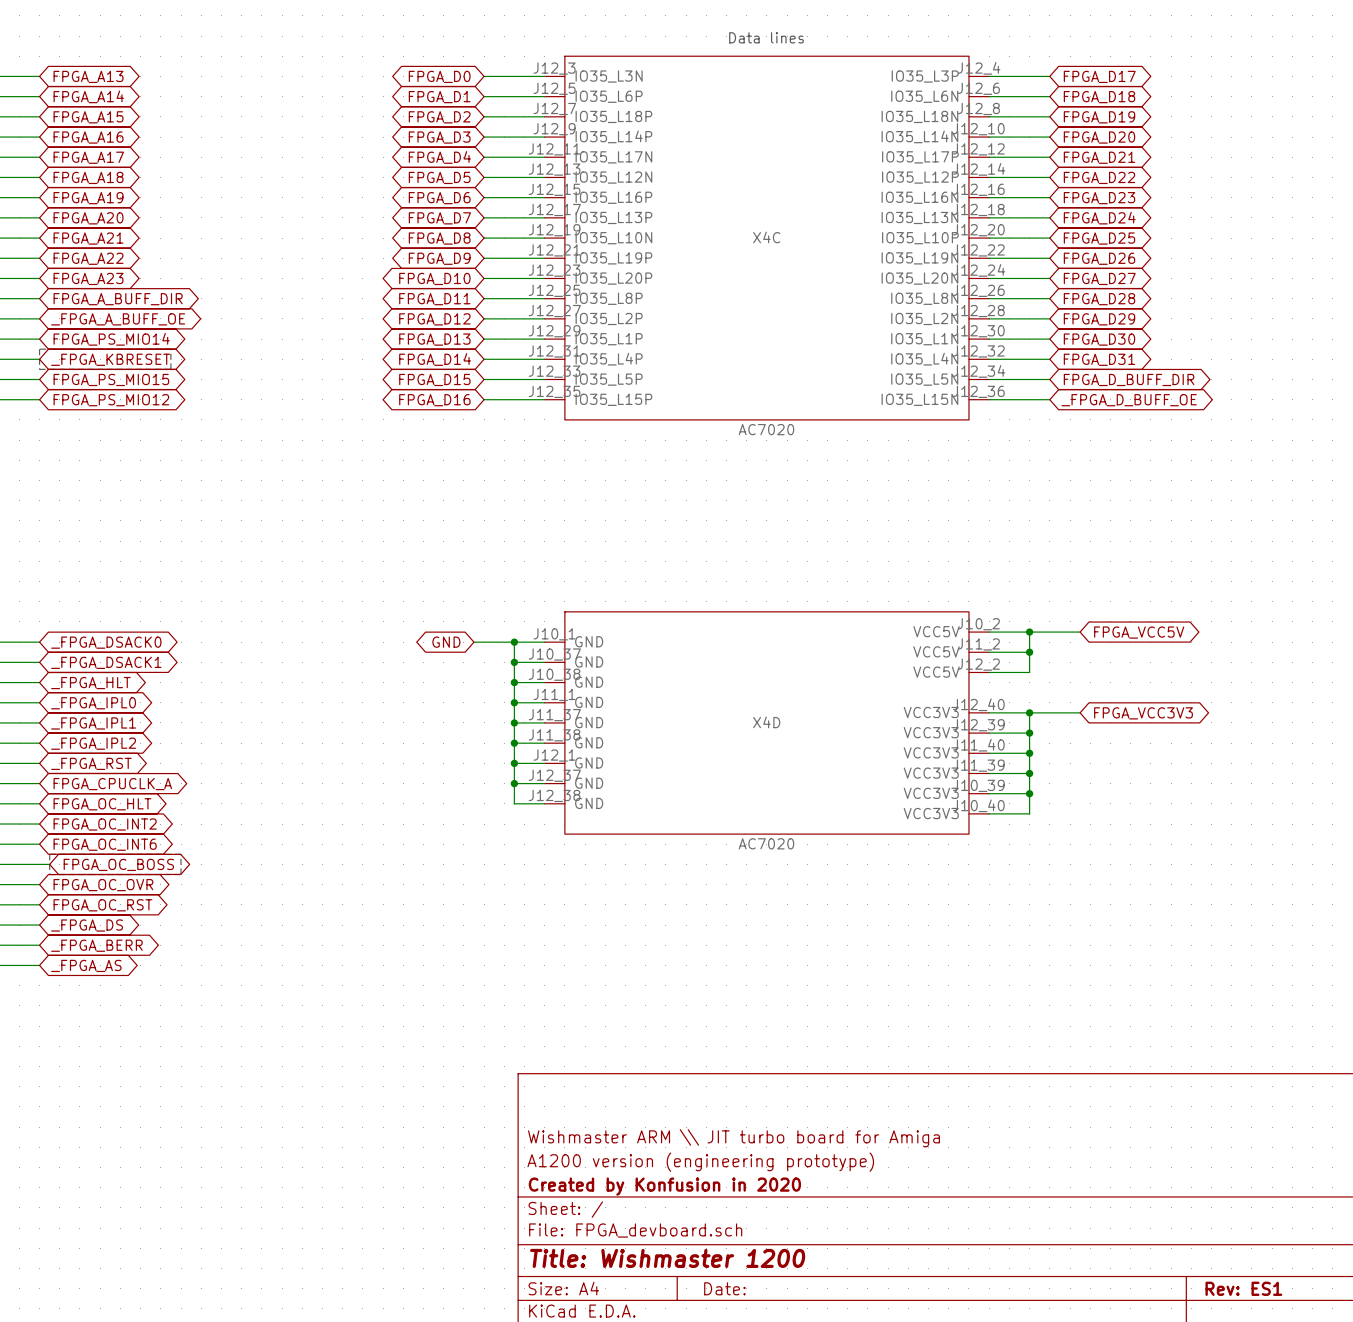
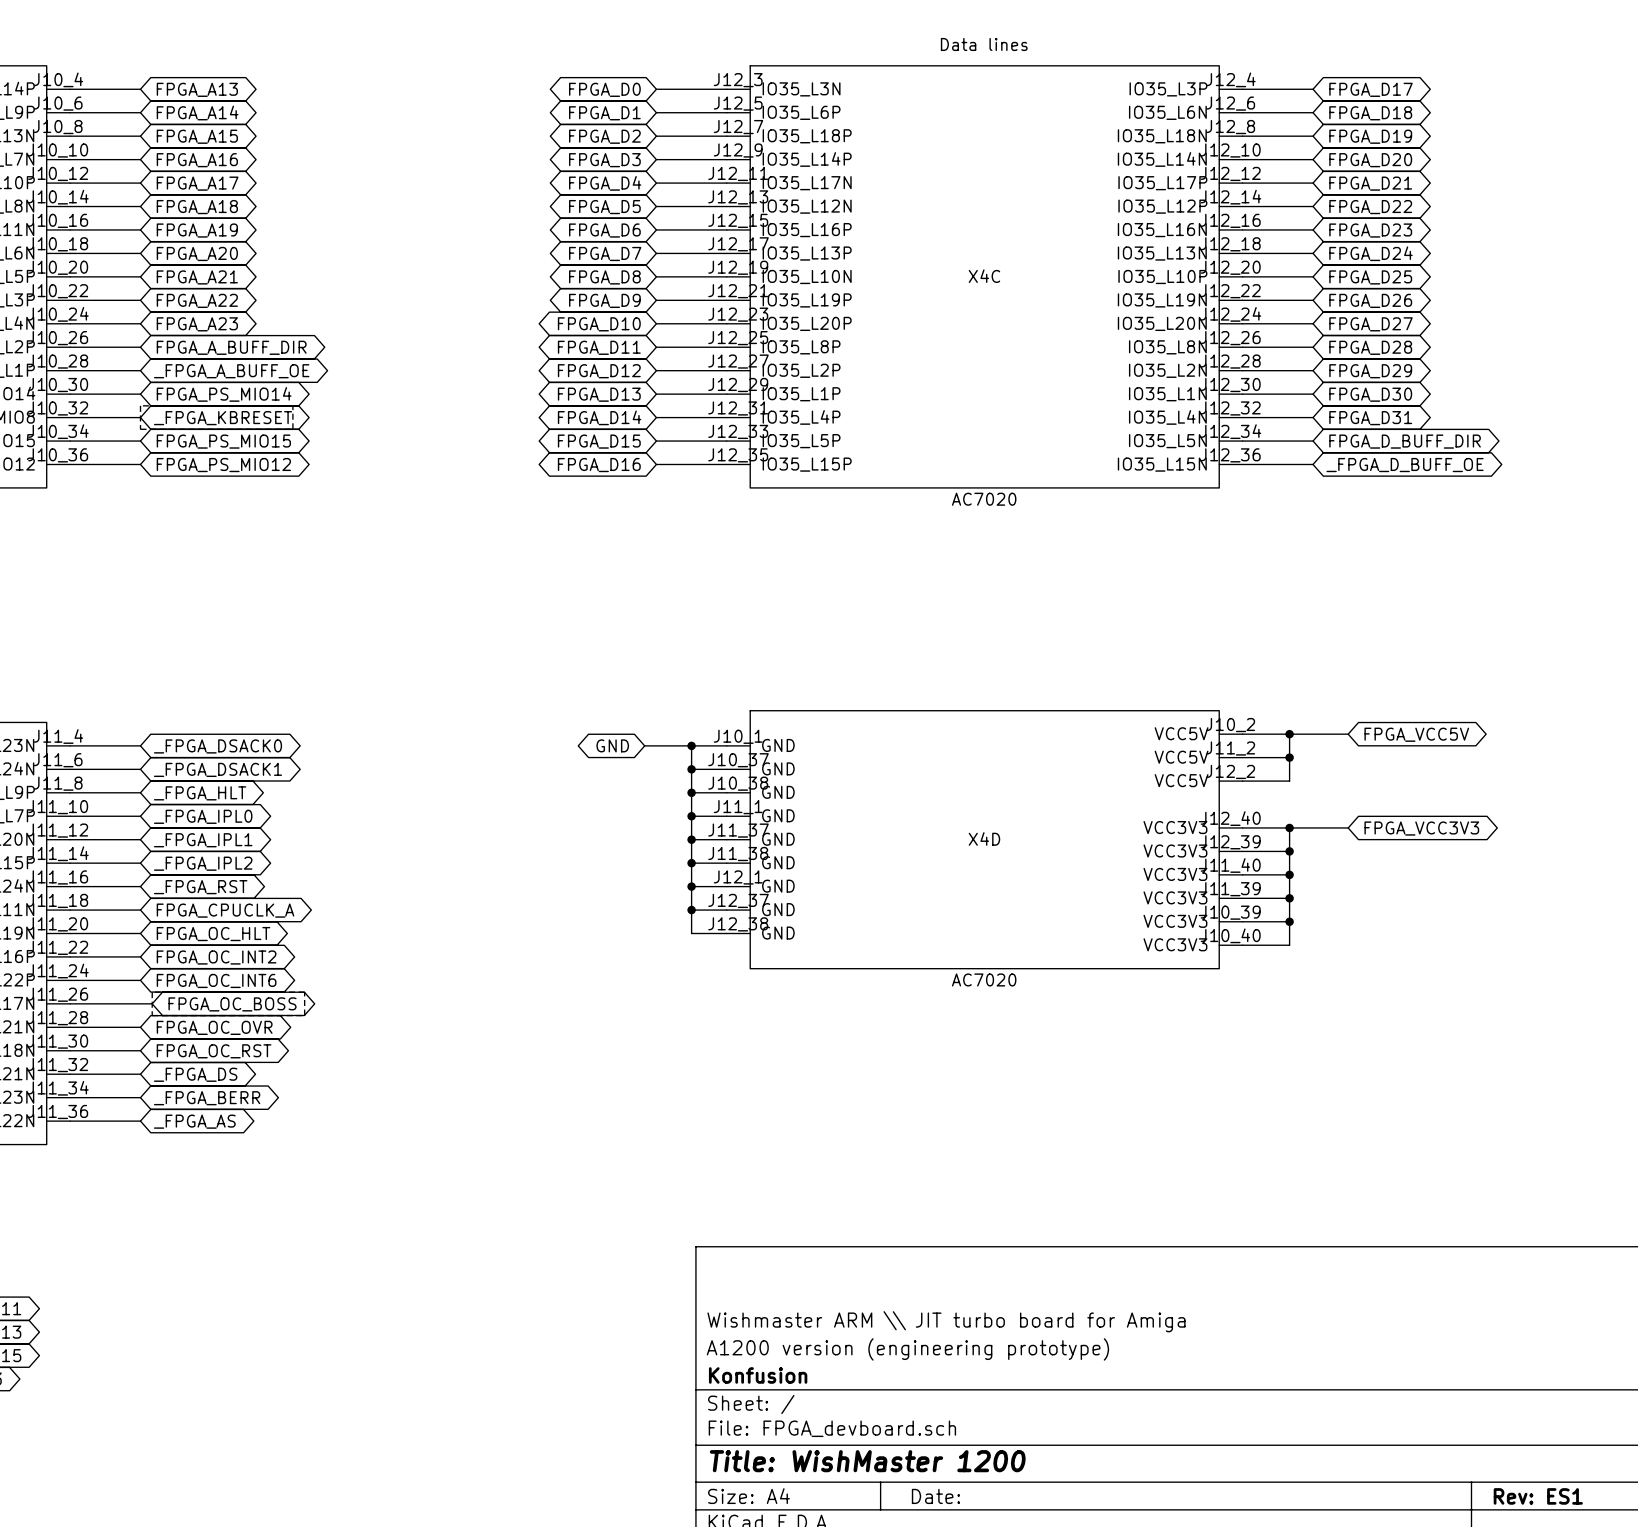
title block: Created by Konfusion in 2020 (664, 1186) -> Konfusion (758, 1375)
title block: Title: Wishmaster 1200 (667, 1258) -> Title: WishMaster 1200 (867, 1461)

